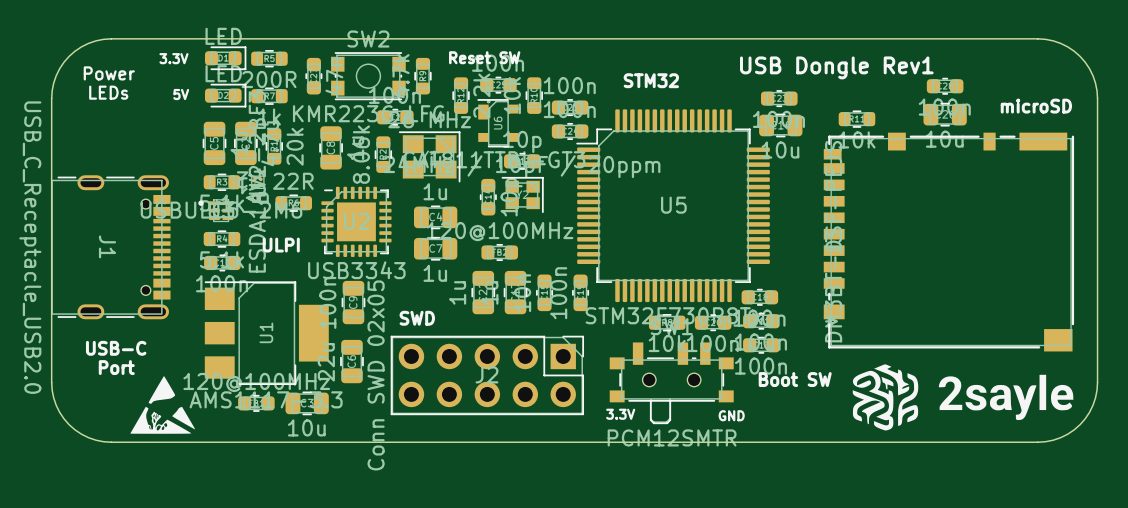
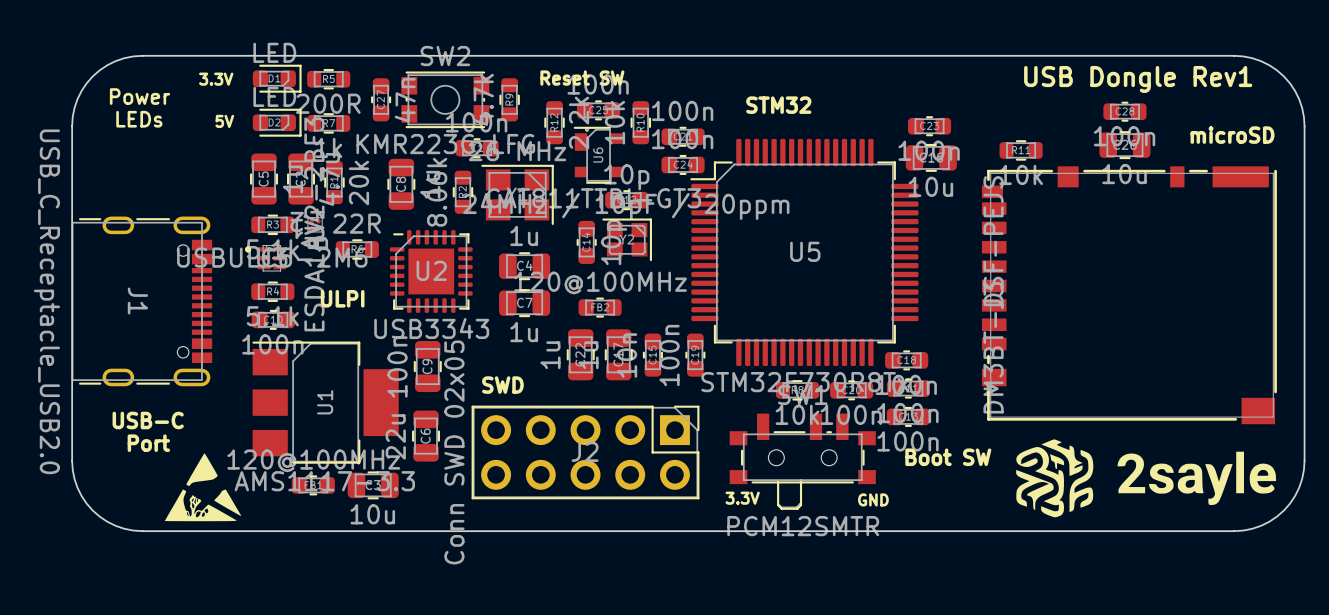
text position: USB Dongle Rev1 (836, 67) -> USB Dongle Rev1 (1138, 79)

